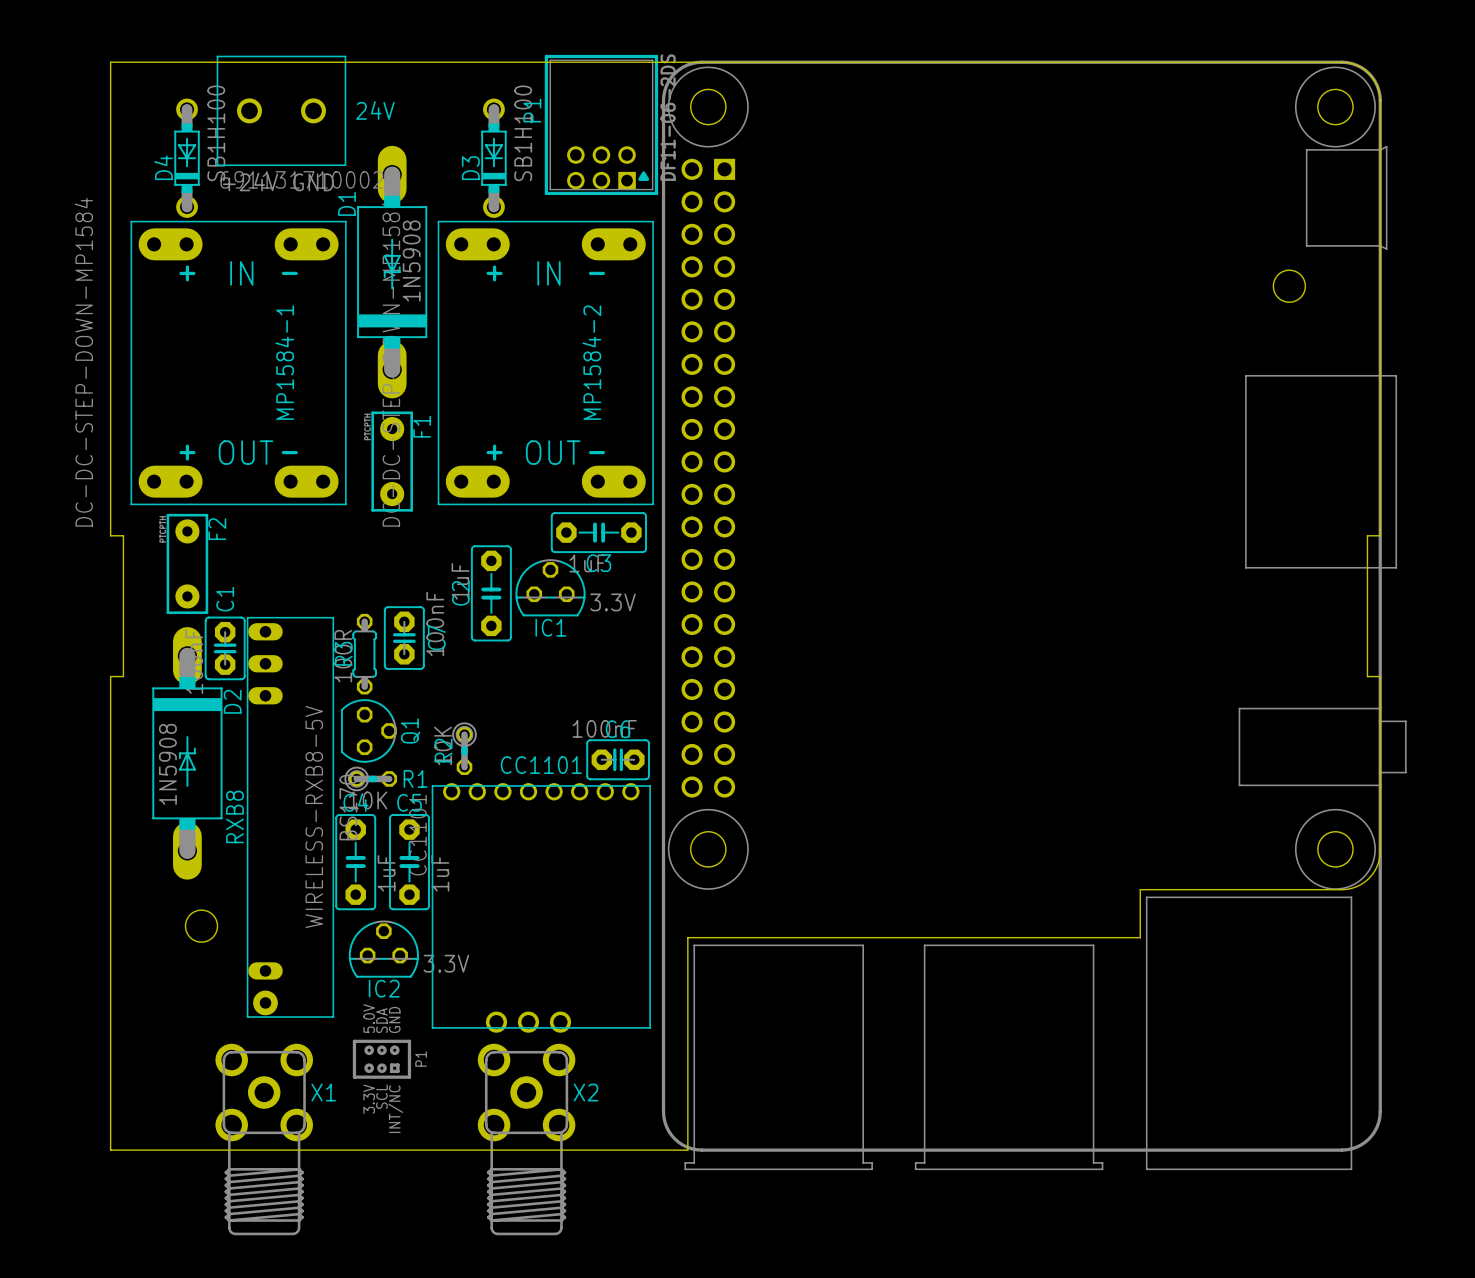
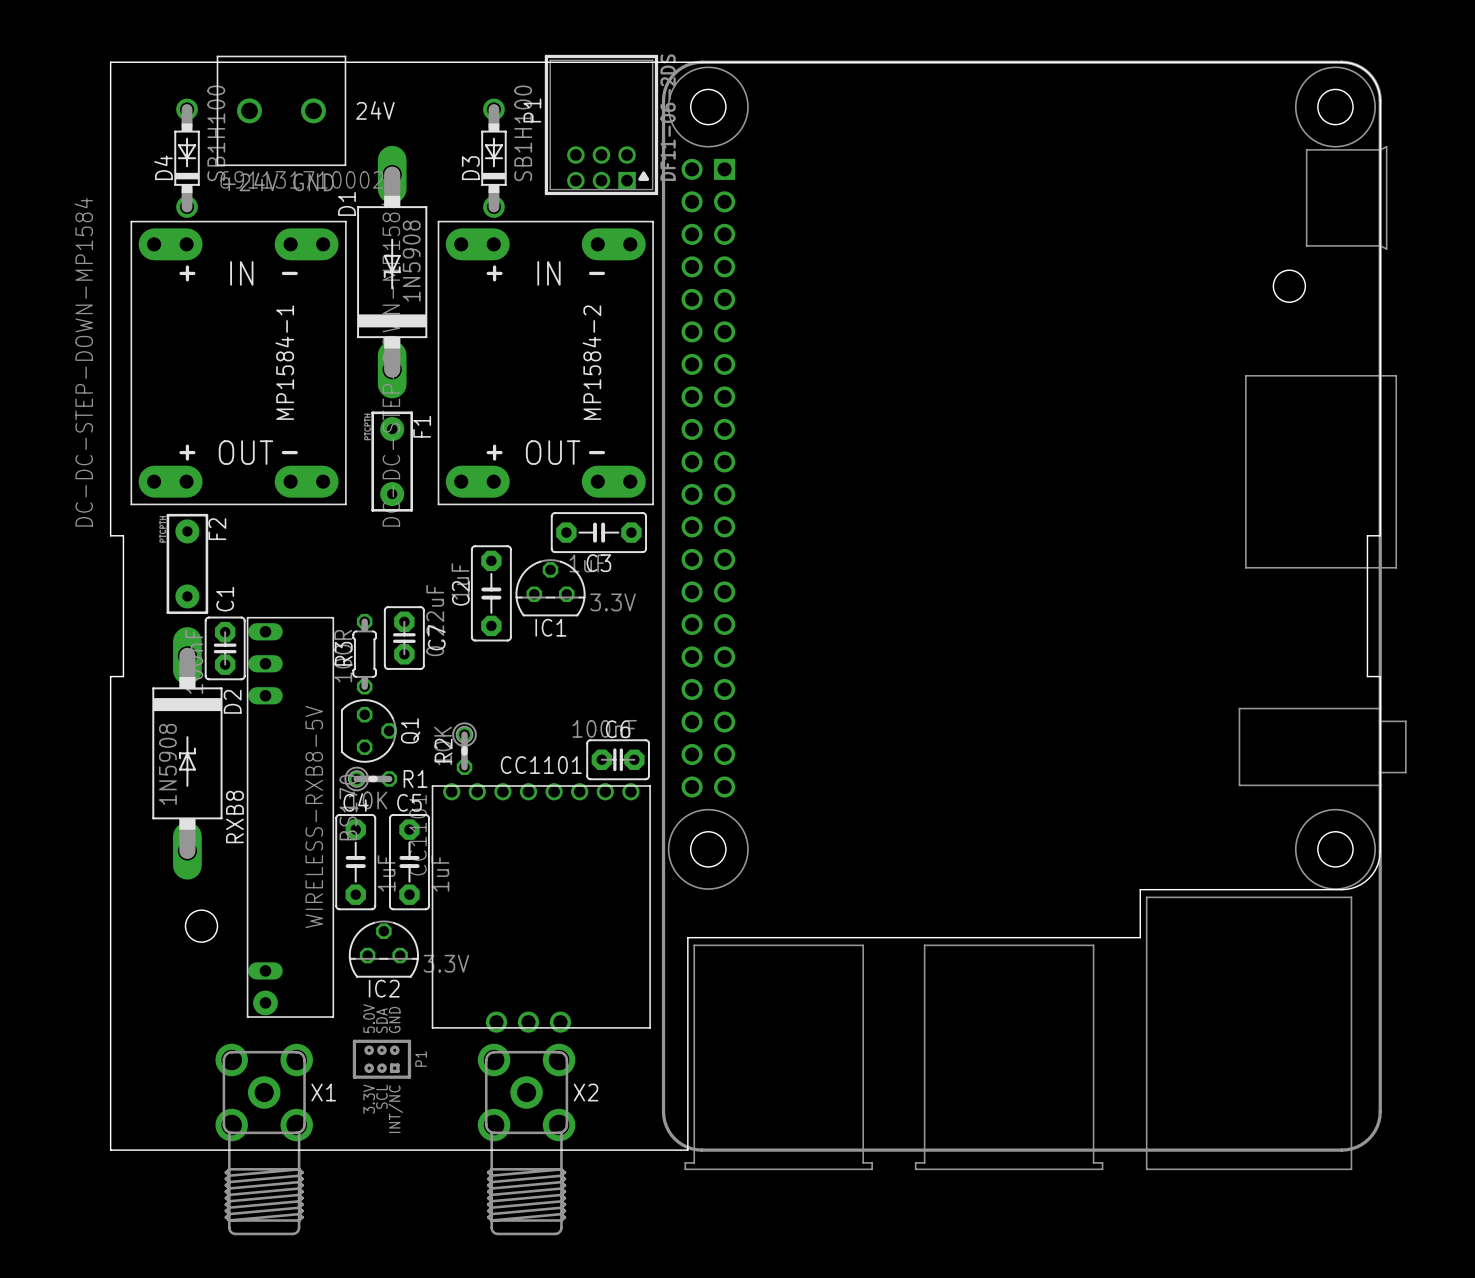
C7 value: 100nF (435, 623) -> 0.22uF (435, 620)

